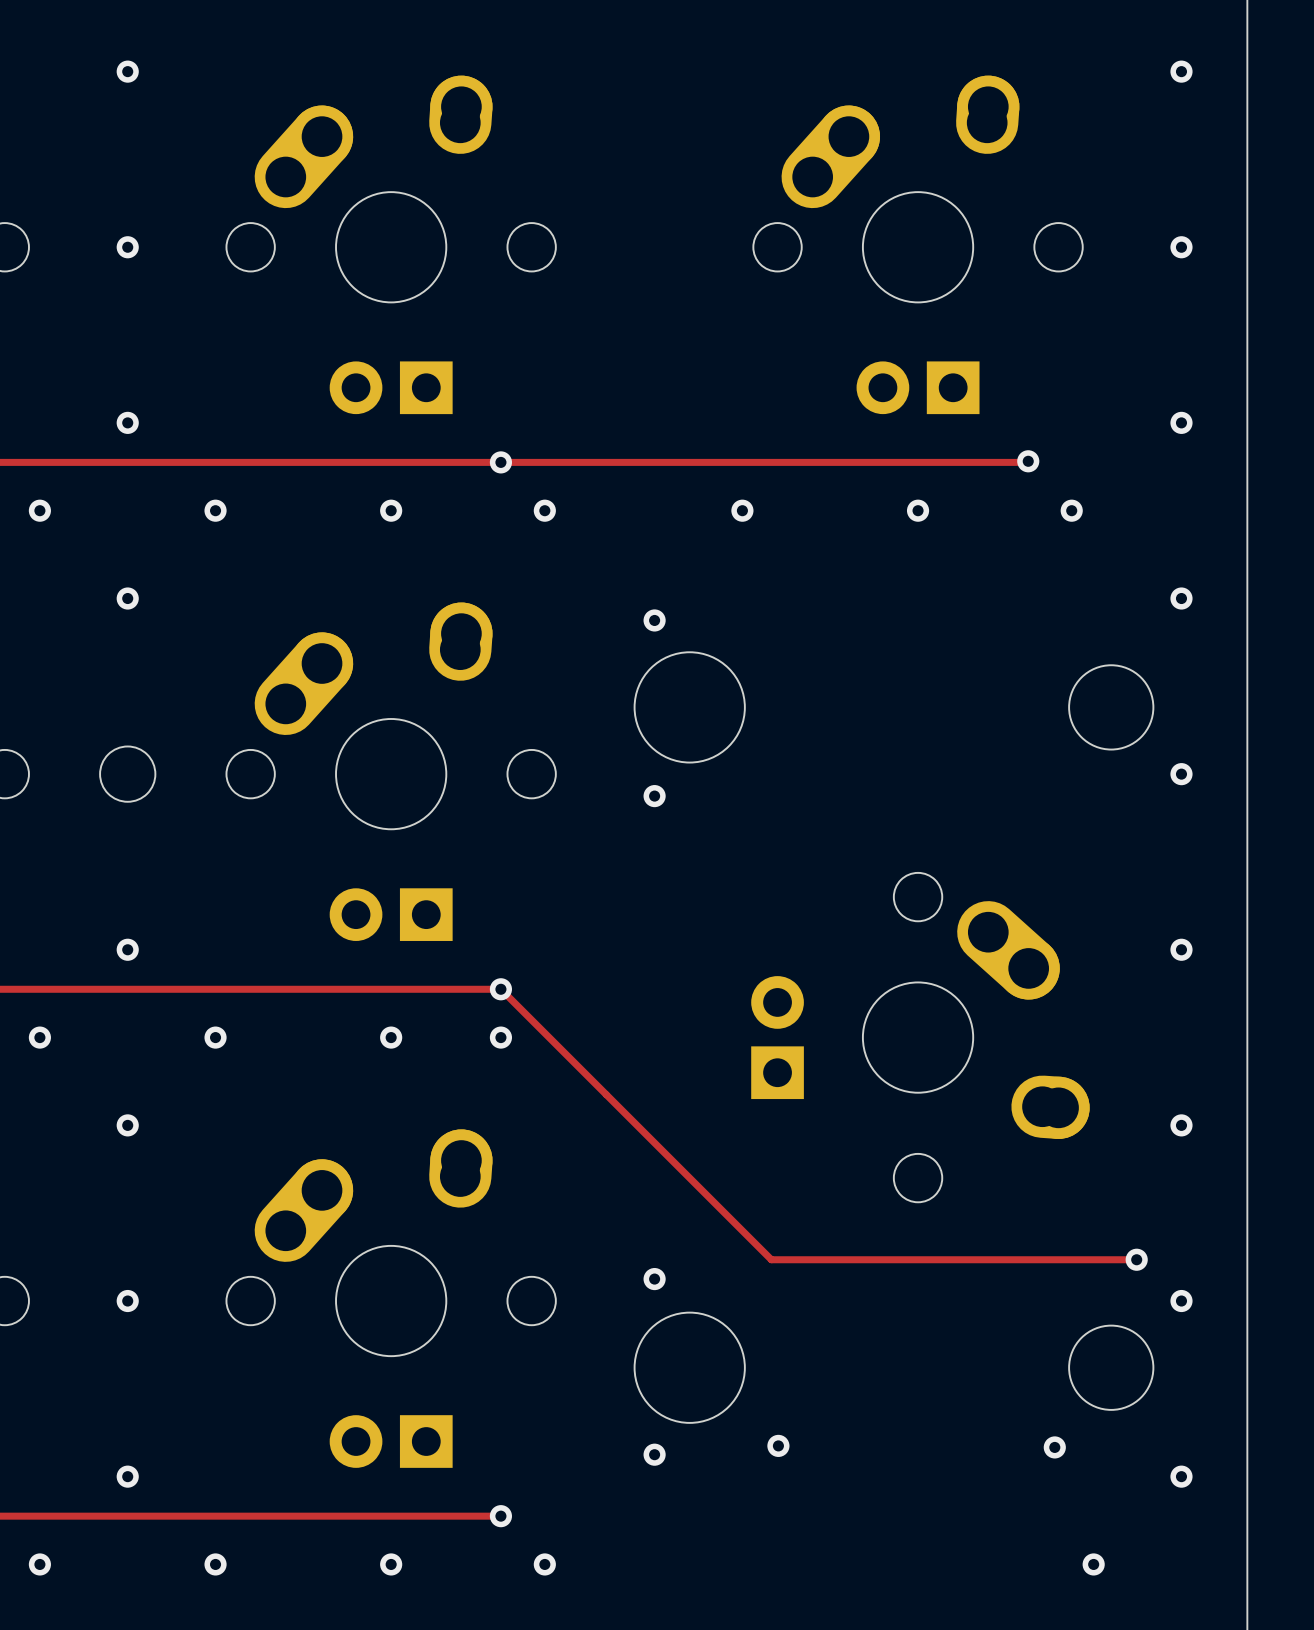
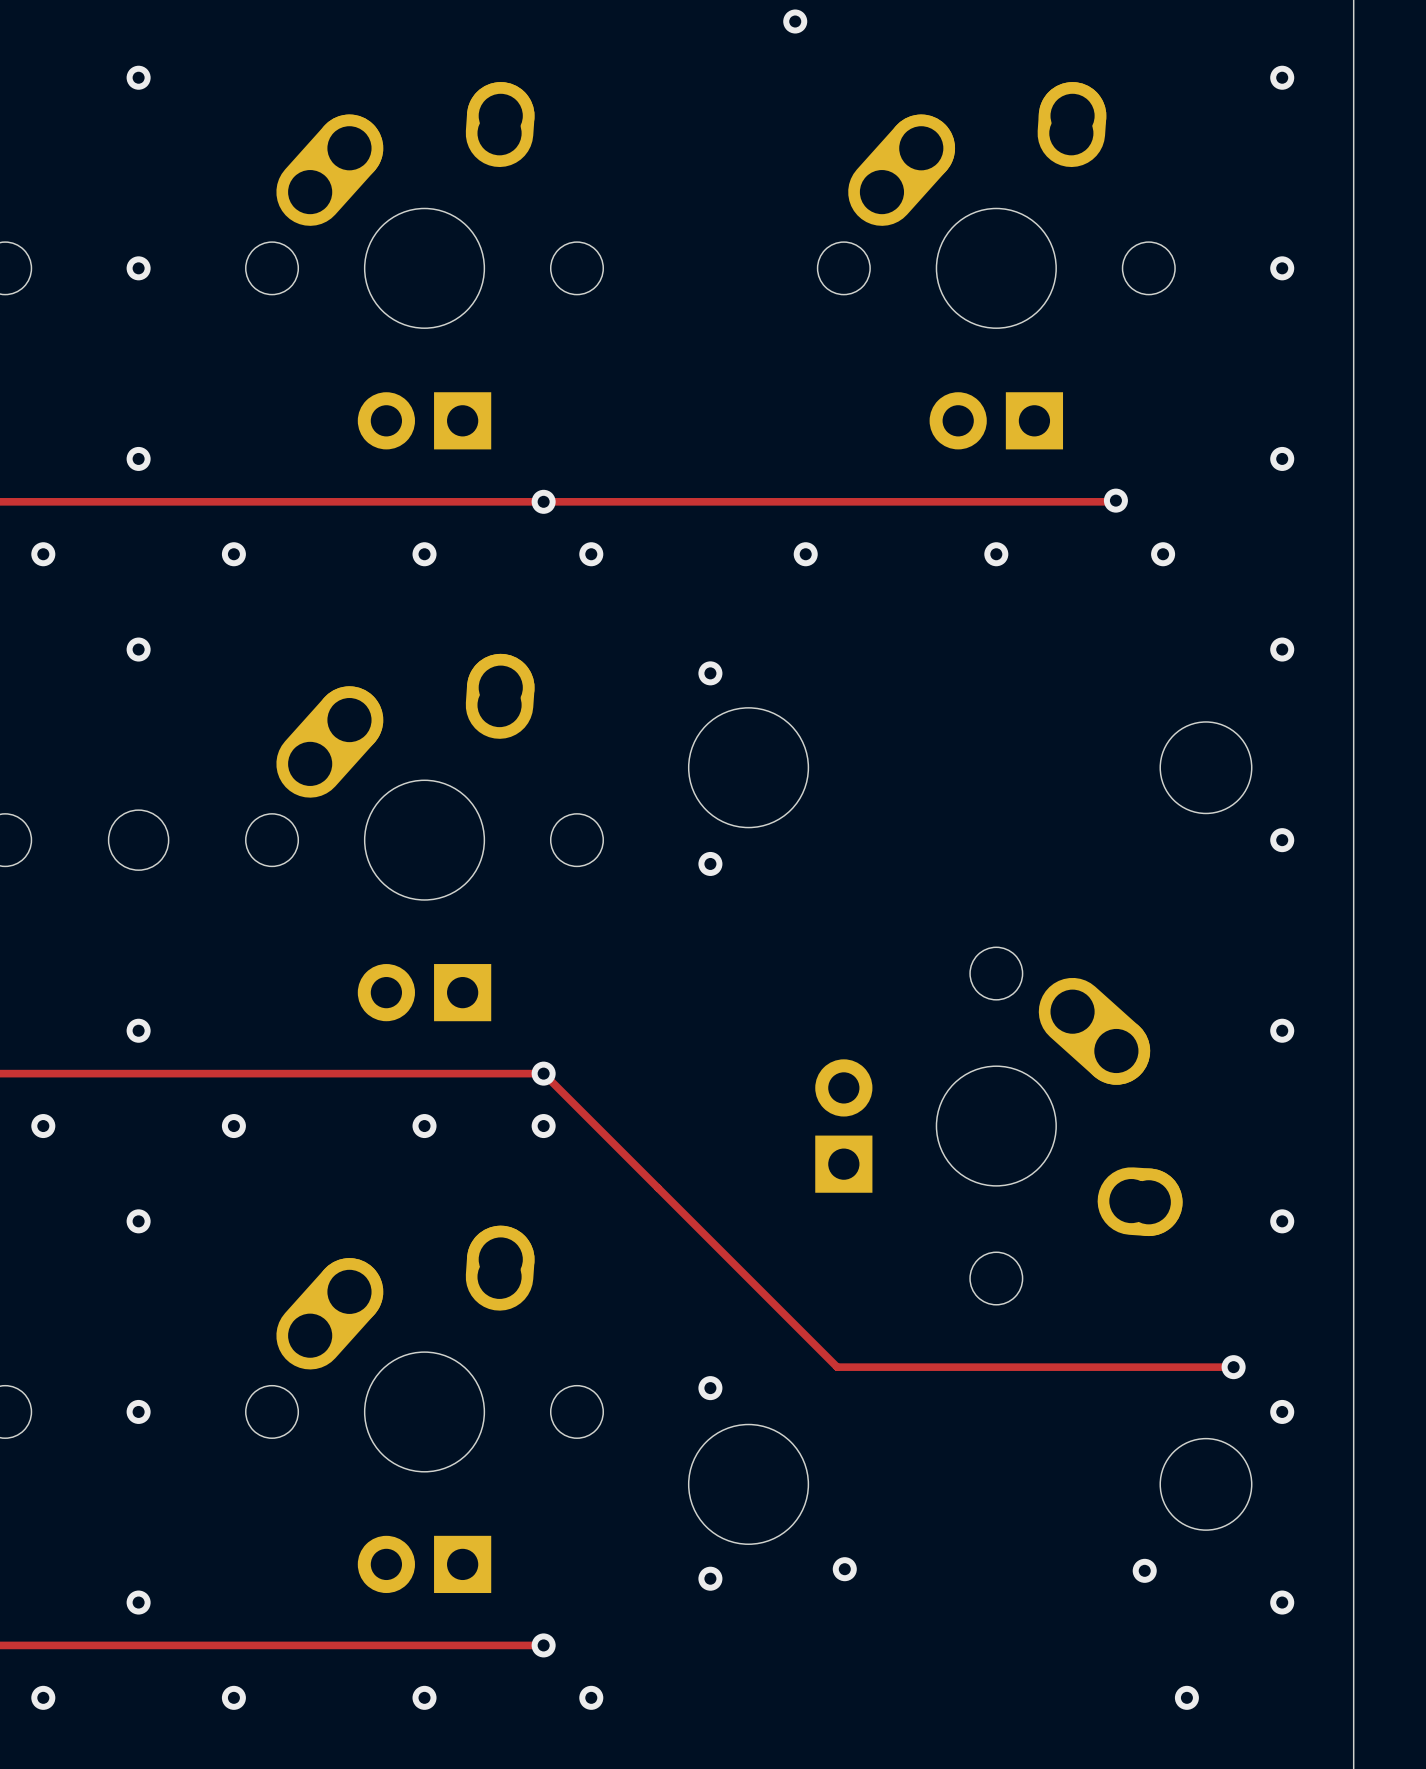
via: none -> (795, 21)

